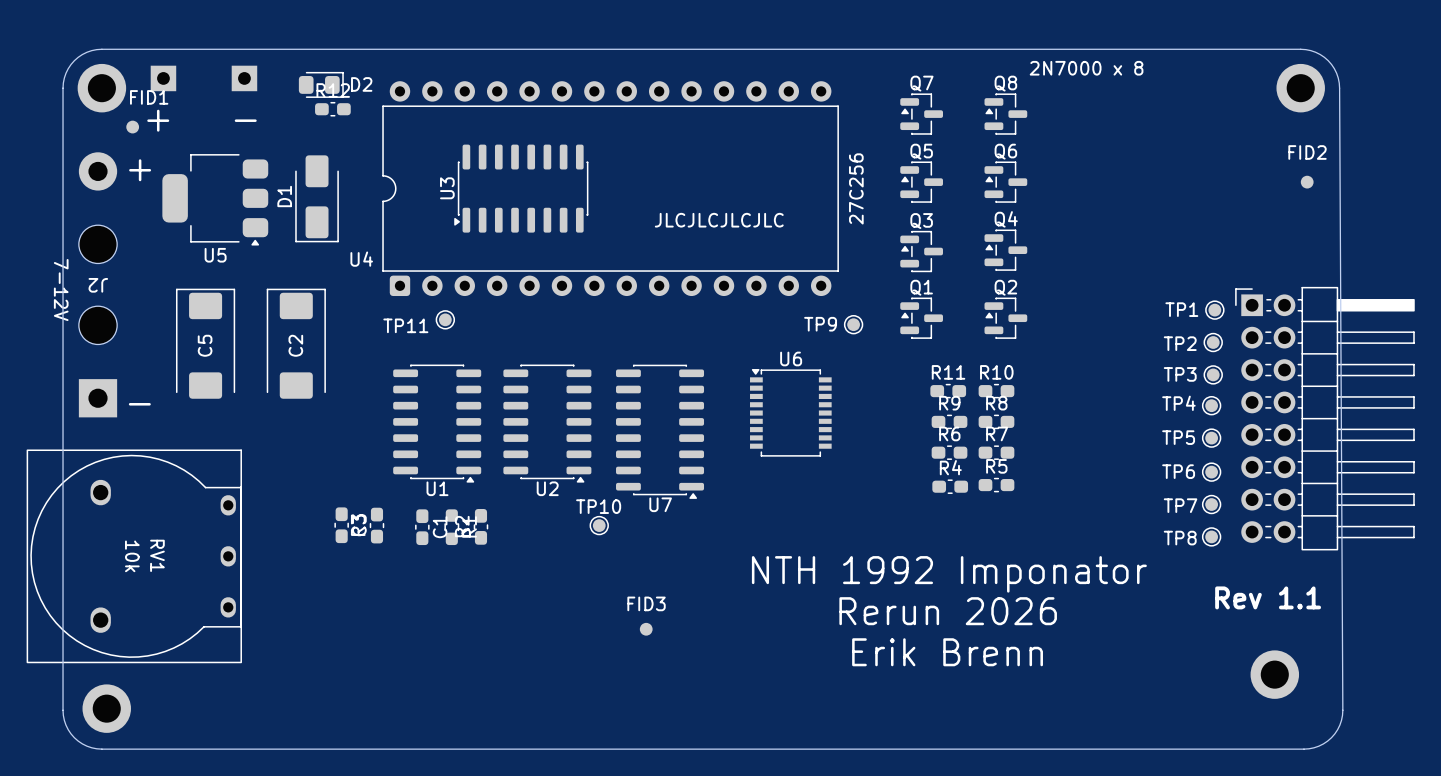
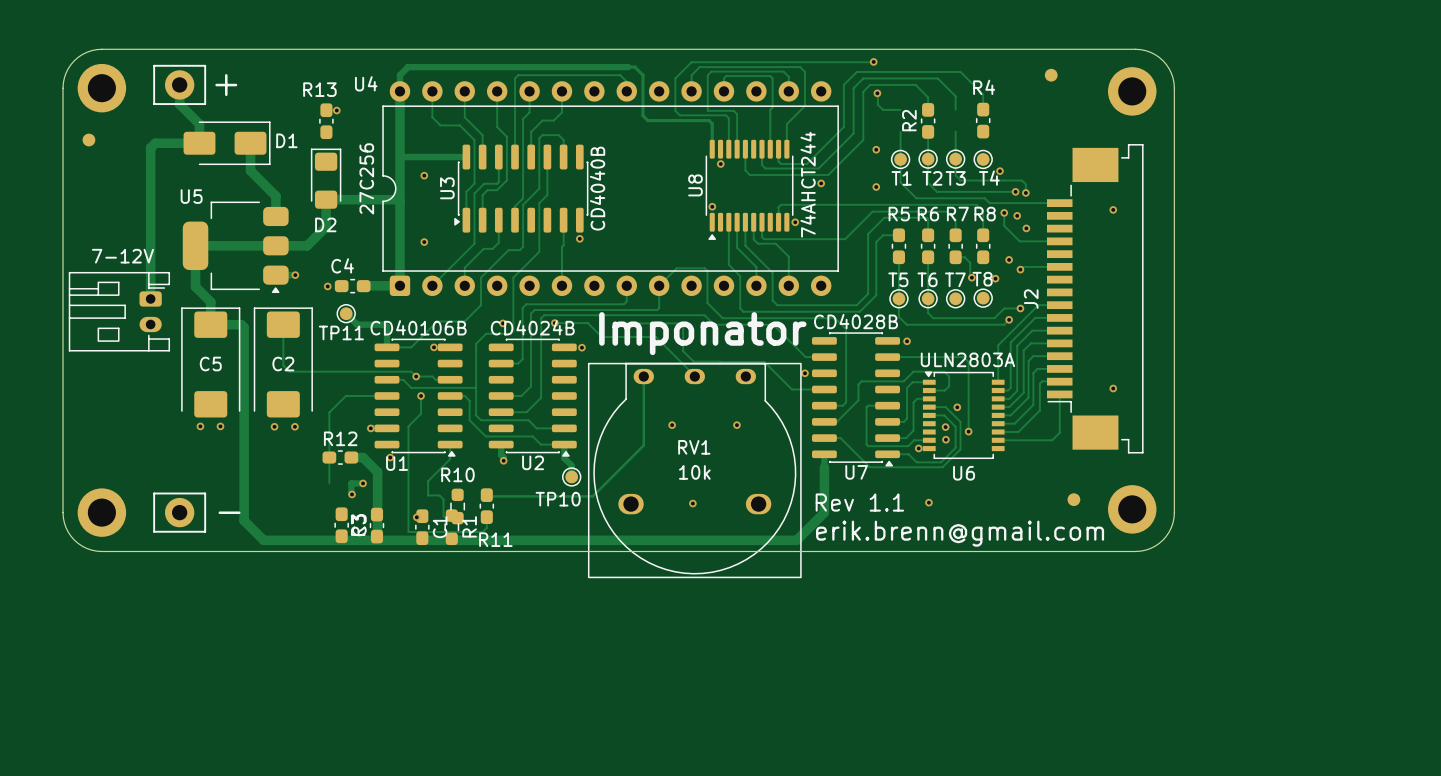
board edge: (1135, 49) (1305, 49) (1324, 57) (1334, 68) (1338, 78) (1342, 710) (1341, 720) (1334, 733) (1318, 746) (1303, 749) (96, 748) (82, 743) (74, 737) (65, 725) (63, 715) (63, 512) -> (1135, 49) (1150, 52) (1162, 60) (1171, 73) (1174, 88) (1174, 512) (1171, 527) (1166, 536) (1150, 548) (1135, 551) (101, 551) (87, 548) (74, 540) (65, 527) (63, 512)
track: none -> (873, 61) (691, 62) (675, 78) (675, 110) (679, 115) (725, 115) (728, 118) (728, 149)
via: none -> (873, 61)
text: 2N7000 x 8 (1086, 68) -> none
D2 footprint: [298, 71, 344, 98] -> [310, 148, 342, 209]
part: none -> (1051, 75)
part: (163, 78) -> none
part: (244, 78) -> none
track: none -> (179, 84) (179, 104) (199, 124) (199, 143) (155, 143) (150, 147) (150, 298)
part: none -> (179, 84)
D2 name position: D2 (361, 84) -> D2 (325, 224)
text: none -> + (226, 85)
part position: (1300, 88) -> (1132, 91)
track: none -> (432, 91) (432, 117) (440, 125) (459, 125) (474, 140) (474, 183) (466, 191) (466, 220)
track: none -> (464, 91) (464, 117) (482, 135) (482, 157)
track: none -> (497, 91) (497, 127) (506, 136) (506, 180) (497, 190) (487, 190) (482, 195) (482, 220)
track: none -> (529, 91) (529, 112) (523, 118) (523, 198) (515, 206) (515, 220)
track: none -> (561, 91) (561, 112) (553, 120) (542, 120) (531, 131) (531, 157)
track: none -> (626, 91) (626, 81) (620, 75) (518, 75) (515, 78) (515, 157)
track: none -> (691, 91) (691, 75) (699, 67) (800, 67) (804, 71) (804, 105) (786, 124) (786, 149)
track: none -> (723, 91) (723, 78) (726, 76) (770, 76) (772, 78) (770, 149)
track: none -> (788, 91) (788, 76) (783, 71) (711, 71) (707, 75) (707, 110) (733, 110) (737, 114) (737, 149)
track: none -> (877, 93) (877, 104) (883, 109) (900, 109)
via: none -> (877, 93)
R12 position: (332, 109) -> (340, 457)
track: none -> (928, 109) (928, 97) (915, 84) (870, 84) (863, 91) (863, 140) (828, 175) (749, 175) (745, 170) (745, 149)
track: none -> (955, 109) (955, 96) (937, 78) (863, 78) (853, 88) (853, 133) (818, 168) (765, 168) (761, 165) (761, 149)
track: none -> (983, 109) (983, 94) (960, 71) (856, 71) (843, 84) (843, 127) (806, 163) (781, 163) (778, 161) (778, 149)
via: none -> (336, 110)
Q7: (921, 114) -> none
Q8: (1005, 114) -> none
text: + (158, 120) -> none
text: - (245, 120) -> none
R13: none -> (326, 121)
FID1: (132, 127) -> none
track: none -> (900, 131) (900, 182) (916, 198) (984, 198) (989, 203) (1059, 203)
track: none -> (928, 131) (928, 182) (937, 191) (1015, 191)
track: none -> (955, 131) (955, 175) (960, 180) (1021, 180) (1025, 184) (1025, 192)
part: none -> (88, 140)
track: none -> (250, 143) (250, 170) (275, 196) (275, 216)
track: none -> (712, 149) (712, 123) (709, 120) (647, 120) (642, 115) (642, 75) (634, 67) (408, 67) (399, 75) (399, 285) (363, 286)
via: none -> (876, 149)
J2 footprint: [78, 152, 118, 418] -> [1047, 144, 1144, 454]
track: none -> (404, 157) (466, 157)
track: none -> (498, 157) (498, 182) (484, 183) (474, 193) (474, 243) (432, 285)
track: none -> (547, 157) (547, 195) (539, 203) (539, 251) (513, 277) (513, 331) (510, 333) (486, 333) (476, 343) (476, 415) (480, 420) (528, 420) (536, 428) (564, 428)
track: none -> (563, 157) (563, 140) (558, 135) (542, 135) (539, 138) (539, 188) (523, 204) (523, 246) (519, 250) (508, 250) (480, 277) (480, 305) (464, 321) (437, 321) (411, 347) (387, 347) (387, 327) (384, 324) (357, 324) (346, 313)
T1: none -> (900, 159)
T2: none -> (928, 159)
T3: none -> (955, 159)
T4: none -> (983, 159)
via: none -> (720, 163)
text: + (140, 170) -> none
via: none -> (999, 171)
via: none -> (424, 175)
Q5: (921, 182) -> none
Q6: (1005, 182) -> none
FID2: (1307, 182) -> none
via: none -> (821, 183)
via: none -> (876, 186)
U3 value: none -> CD4040B (597, 188)
U4 value position: 27C256 (856, 188) -> 27C256 (366, 178)
U8: none -> 74AHCT244 (749, 189)
via: none -> (1015, 191)
via: none -> (1025, 192)
D1 name position: D1 (284, 196) -> D1 (286, 140)
D1 rotation: 0° (317, 198) -> 90° counterclockwise (227, 143)
D1 position: (317, 198) -> (227, 143)
U5 position: (215, 199) -> (235, 247)
track: none -> (399, 201) (398, 199) (326, 199) (326, 226) (307, 245) (195, 245) (195, 286) (210, 302) (210, 324) (241, 324) (244, 327) (244, 520) (263, 540) (796, 540) (824, 512) (824, 454)
via: none -> (712, 206)
via: none -> (1113, 209)
track: none -> (1004, 212) (1004, 225) (1019, 241) (1059, 241)
via: none -> (1004, 212)
via: none -> (1017, 215)
track: none -> (498, 220) (498, 242) (492, 248) (483, 248) (464, 267) (464, 285)
track: none -> (563, 220) (561, 285)
text: JLCJLCJLCJLC (719, 220) -> none
track: none -> (728, 222) (728, 264) (740, 276) (740, 308) (743, 311) (859, 311) (876, 295) (876, 242) (883, 235) (898, 235)
track: none -> (737, 222) (737, 247) (756, 267) (756, 285)
track: none -> (745, 222) (745, 245) (772, 272) (772, 300) (777, 305) (856, 305) (868, 293) (868, 233) (884, 217) (926, 217) (928, 235)
track: none -> (753, 222) (753, 239) (758, 243) (775, 243) (788, 256) (788, 285)
track: none -> (761, 222) (761, 237) (764, 239) (845, 239) (872, 211) (947, 211) (955, 219) (955, 235) (950, 230)
track: none -> (778, 222) (778, 207) (781, 204) (976, 204) (983, 211) (983, 235)
via: none -> (795, 222)
via: none -> (1026, 228)
via: none -> (579, 238)
via: none -> (424, 242)
Q4: (1005, 250) -> none
Q3: (921, 251) -> none
U5 name position: U5 (215, 255) -> U5 (191, 196)
track: none -> (898, 257) (898, 316) (906, 324) (1004, 324) (1009, 319)
track: none -> (925, 257) (928, 257) (928, 313) (933, 318) (994, 318) (1004, 308) (1020, 308)
track: none -> (955, 257) (964, 257) (970, 262) (971, 277)
U4 name position: U4 (361, 259) -> U4 (366, 83)
via: none -> (1009, 259)
track: none -> (1059, 266) (1023, 266) (1020, 269)
via: none -> (1020, 269)
via: none -> (295, 275)
via: none -> (971, 277)
via: none -> (995, 278)
J2 name position: J2 (98, 285) -> J2 (1031, 299)
track: none -> (626, 285) (626, 301) (624, 304) (526, 304) (522, 307) (522, 359) (518, 363) (501, 363)
via: none -> (327, 286)
C4: none -> (352, 286)
J2 value: 7-12V (61, 290) -> none
T5: none -> (898, 298)
T6: none -> (928, 298)
T7: none -> (955, 298)
T8: none -> (983, 298)
track: none -> (1059, 305) (1038, 305) (998, 345) (998, 382)
via: none -> (1020, 308)
TP1: (1214, 310) -> none
part: none -> 7-12V (119, 311)
track: none -> (1059, 317) (1035, 317) (1010, 342) (1010, 387) (1008, 390) (998, 390)
Q1: (921, 318) -> none
Q2: (1005, 318) -> none
TP11 position: (445, 319) -> (346, 313)
via: none -> (1009, 319)
U7 value: none -> CD4028B (856, 321)
via: none -> (503, 323)
track: none -> (554, 323) (587, 323) (601, 337) (655, 337) (694, 376)
via: none -> (554, 323)
track: none -> (631, 323) (681, 323) (683, 351) (693, 361) (764, 361) (792, 389) (824, 389)
track: none -> (283, 324) (283, 365) (289, 371) (411, 371) (416, 376) (432, 376) (435, 379) (450, 379)
TP9: (853, 324) -> none
TP11 name position: TP11 (405, 325) -> TP11 (341, 332)
U1 value: none -> CD40106B (418, 327)
U2 value: none -> CD4024B (532, 327)
track: none -> (1059, 330) (1032, 330) (1017, 345) (1017, 391) (1009, 398) (998, 398)
text: none -> Imponator (702, 333)
via: none -> (907, 341)
TP2: (1213, 342) -> none
C5 position: (205, 343) -> (210, 362)
C2 position: (296, 343) -> (283, 362)
track: none -> (1059, 343) (1030, 343) (1023, 350) (1023, 392) (1009, 407) (998, 407)
C5 name rotation: 0° (205, 345) -> 90° clockwise (210, 364)
C2 name rotation: 0° (295, 345) -> 90° clockwise (283, 364)
via: none -> (434, 347)
via: none -> (581, 347)
track: none -> (1059, 356) (1033, 356) (1028, 360) (1028, 397) (1010, 415) (998, 415)
track: none -> (824, 357) (805, 357) (773, 324) (714, 324) (704, 315) (544, 315) (541, 318) (541, 397) (526, 412) (501, 412)
track: none -> (887, 357) (963, 357) (968, 361) (968, 431)
U6 name position: U6 (791, 358) -> U6 (964, 473)
U6 value: none -> ULN2803A (967, 359)
track: none -> (1059, 368) (1037, 368) (1033, 372) (1033, 404) (1014, 423) (998, 423)
R11 name position: R11 (948, 372) -> R11 (495, 539)
via: none -> (804, 373)
TP3: (1213, 374) -> none
via: none -> (416, 376)
track: none -> (643, 376) (643, 445) (592, 496) (486, 495)
track: none -> (387, 379) (403, 379) (411, 387) (476, 387)
track: none -> (1059, 381) (1042, 381) (1039, 383) (1039, 410) (1018, 432) (998, 432)
track: none -> (929, 382) (912, 382) (907, 387) (907, 418) (903, 421) (887, 421)
R10 footprint: [978, 383, 1015, 399] -> [450, 488, 466, 525]
via: none -> (1113, 388)
track: none -> (929, 390) (944, 390) (949, 386) (949, 376) (944, 371) (913, 371) (903, 381) (861, 381) (858, 384) (858, 400) (836, 421) (824, 421)
R11 rotation: 0° (948, 391) -> 90° clockwise (486, 506)
R11 position: (948, 391) -> (486, 506)
track: none -> (1059, 394) (1059, 432) (1052, 440) (998, 440)
track: none -> (387, 395) (345, 395) (329, 412) (329, 483)
track: none -> (421, 395) (421, 413) (408, 426) (408, 532) (482, 532) (486, 527) (486, 517)
via: none -> (421, 395)
track: none -> (450, 395) (464, 395) (469, 400) (469, 420) (485, 436) (532, 436) (540, 444) (564, 444) (564, 458) (571, 465) (571, 476)
track: none -> (501, 395) (521, 395) (530, 386) (530, 313) (534, 310) (657, 310) (659, 308) (659, 285) (676, 268) (704, 268) (707, 270) (707, 302) (722, 318) (835, 318) (846, 329) (846, 402) (842, 405) (824, 405)
track: none -> (929, 398) (917, 398) (913, 402) (913, 430) (906, 438) (887, 438)
text rotation: 0° (139, 404) -> 180° (229, 512)
text position: - (139, 404) -> - (229, 512)
track: none -> (887, 405) (866, 407) (866, 444) (868, 446) (908, 446) (914, 440) (929, 440)
TP4: (1211, 405) -> none
track: none -> (929, 407) (945, 407) (960, 421) (960, 449) (942, 467) (869, 467) (840, 438) (824, 438)
via: none -> (957, 407)
U6 position: (790, 412) -> (963, 415)
track: none -> (929, 415) (944, 415) (955, 426) (955, 447) (941, 462) (916, 462) (908, 454) (887, 454)
part: (1324, 418) -> none
R9: (949, 421) -> none
R8 rotation: 0° (996, 421) -> 90° clockwise (983, 246)
R8 position: (996, 421) -> (983, 246)
U1 position: (437, 423) -> (418, 397)
U2 position: (547, 423) -> (532, 397)
via: none -> (672, 425)
via: none -> (736, 425)
via: none -> (200, 426)
via: none -> (220, 426)
via: none -> (274, 426)
via: none -> (294, 426)
via: none -> (945, 427)
via: none -> (370, 428)
U7 position: (660, 431) -> (856, 399)
via: none -> (968, 431)
TP5: (1211, 438) -> none
via: none -> (945, 439)
track: none -> (450, 444) (450, 459) (428, 481) (428, 495) (439, 495) (443, 499) (443, 516) (445, 518) (457, 518)
track: none -> (501, 444) (501, 455) (503, 460)
via: none -> (918, 448)
R6 rotation: 0° (949, 452) -> 90° clockwise (928, 246)
R6 position: (949, 452) -> (928, 246)
R7 rotation: 0° (996, 452) -> 90° clockwise (955, 246)
R7 position: (996, 452) -> (955, 246)
track: none -> (351, 457) (363, 457) (377, 472) (377, 540)
via: none -> (390, 457)
via: none -> (503, 460)
TP6: (1211, 472) -> none
track: none -> (363, 483) (351, 483) (352, 494)
via: none -> (363, 483)
R5 rotation: 0° (996, 485) -> 90° clockwise (898, 246)
R5 position: (996, 485) -> (898, 246)
R4 rotation: 0° (950, 486) -> 90° clockwise (983, 120)
R4 position: (950, 486) -> (983, 120)
U1 name position: U1 (437, 488) -> U1 (397, 463)
via: none -> (352, 494)
part: none -> (1073, 499)
text: none -> Rev 1.1 (859, 502)
via: none -> (928, 502)
via: none -> (692, 503)
TP7: (1211, 504) -> none
TP10 name position: TP10 (598, 506) -> TP10 (558, 499)
part: none -> (179, 512)
via: none -> (416, 517)
TP10 position: (599, 525) -> (571, 476)
R2 position: (480, 526) -> (928, 120)
text: none -> erik.brenn@gmail.com (960, 533)
TP8: (1211, 536) -> none
RV1 rotation: 0° (134, 556) -> 90° counterclockwise (694, 470)
RV1 position: (134, 556) -> (694, 470)
text: NTH 1992 Imponator (949, 574) -> none
text: Rev 1.1 (1268, 597) -> none
text: Rerun 2026 (948, 611) -> none
FID3: (646, 629) -> none
text: Erik Brenn (947, 652) -> none
part position: (1274, 674) -> (1132, 509)
part position: (106, 708) -> (101, 512)

